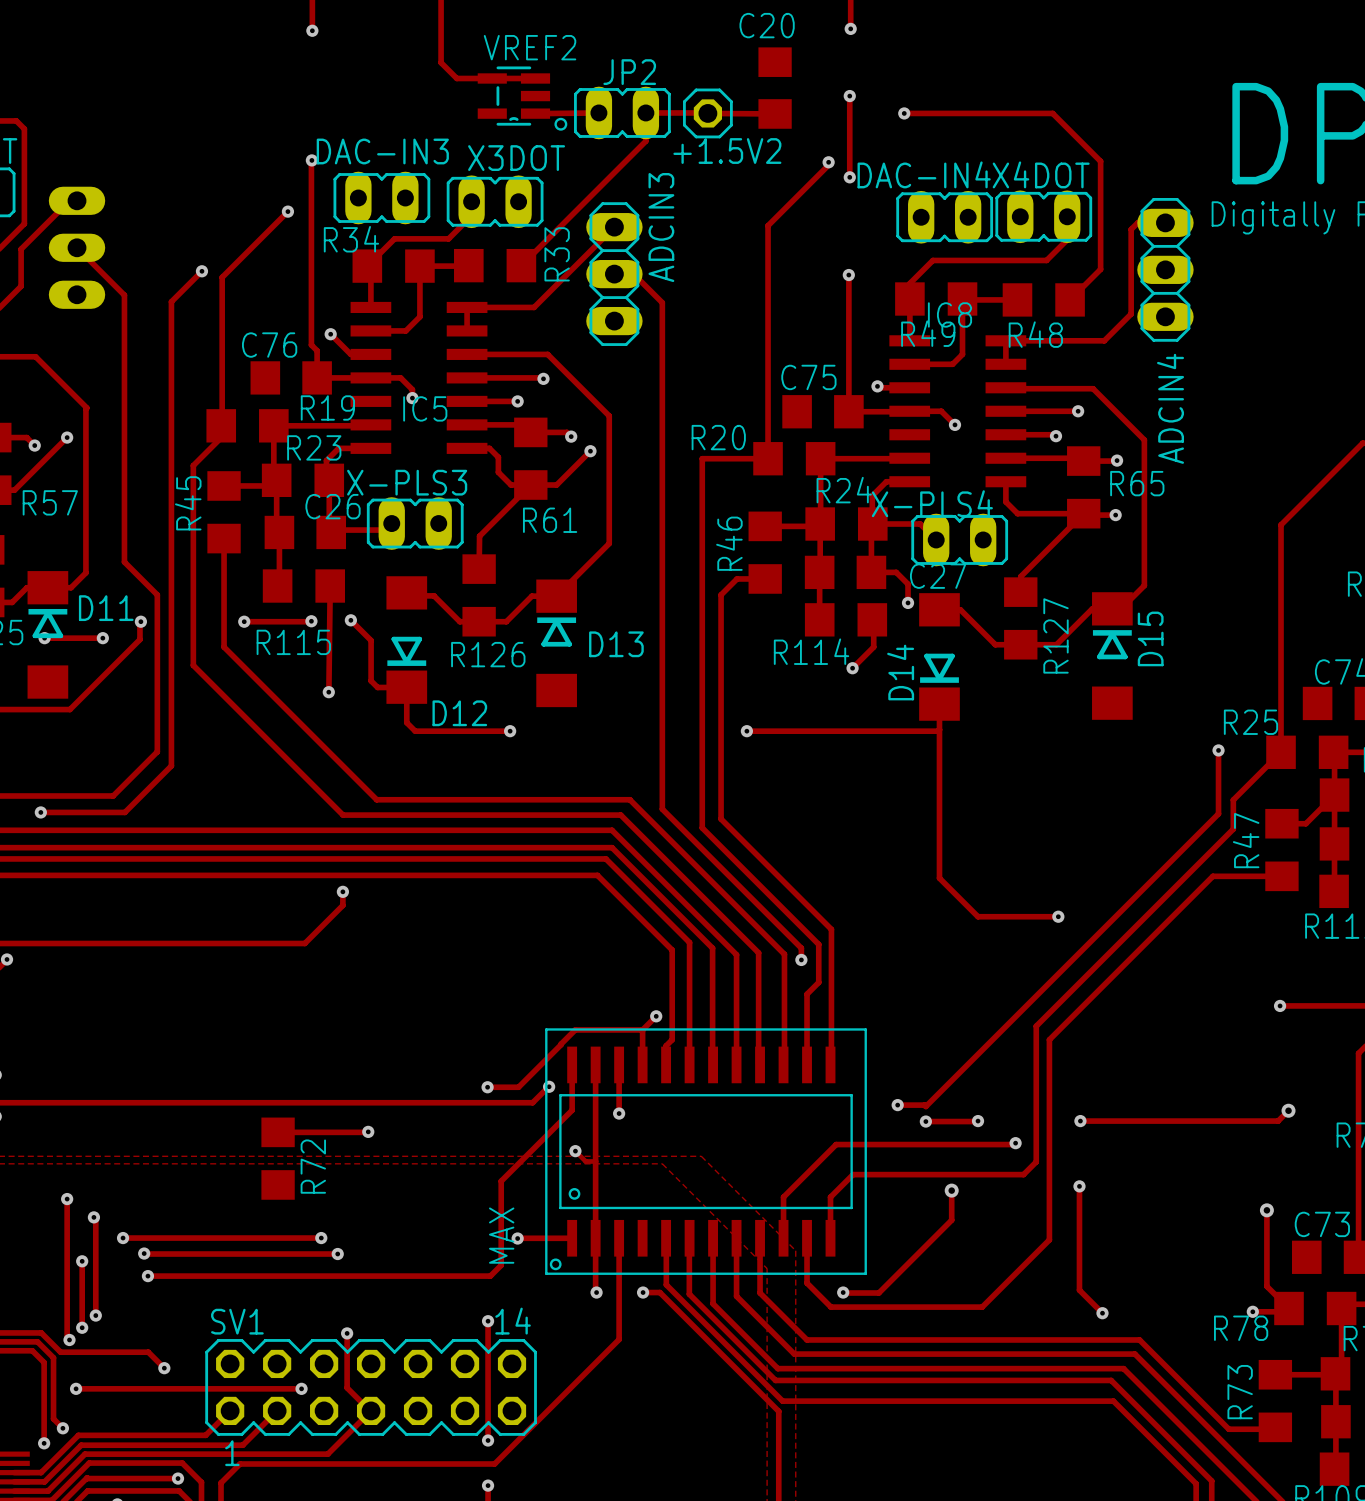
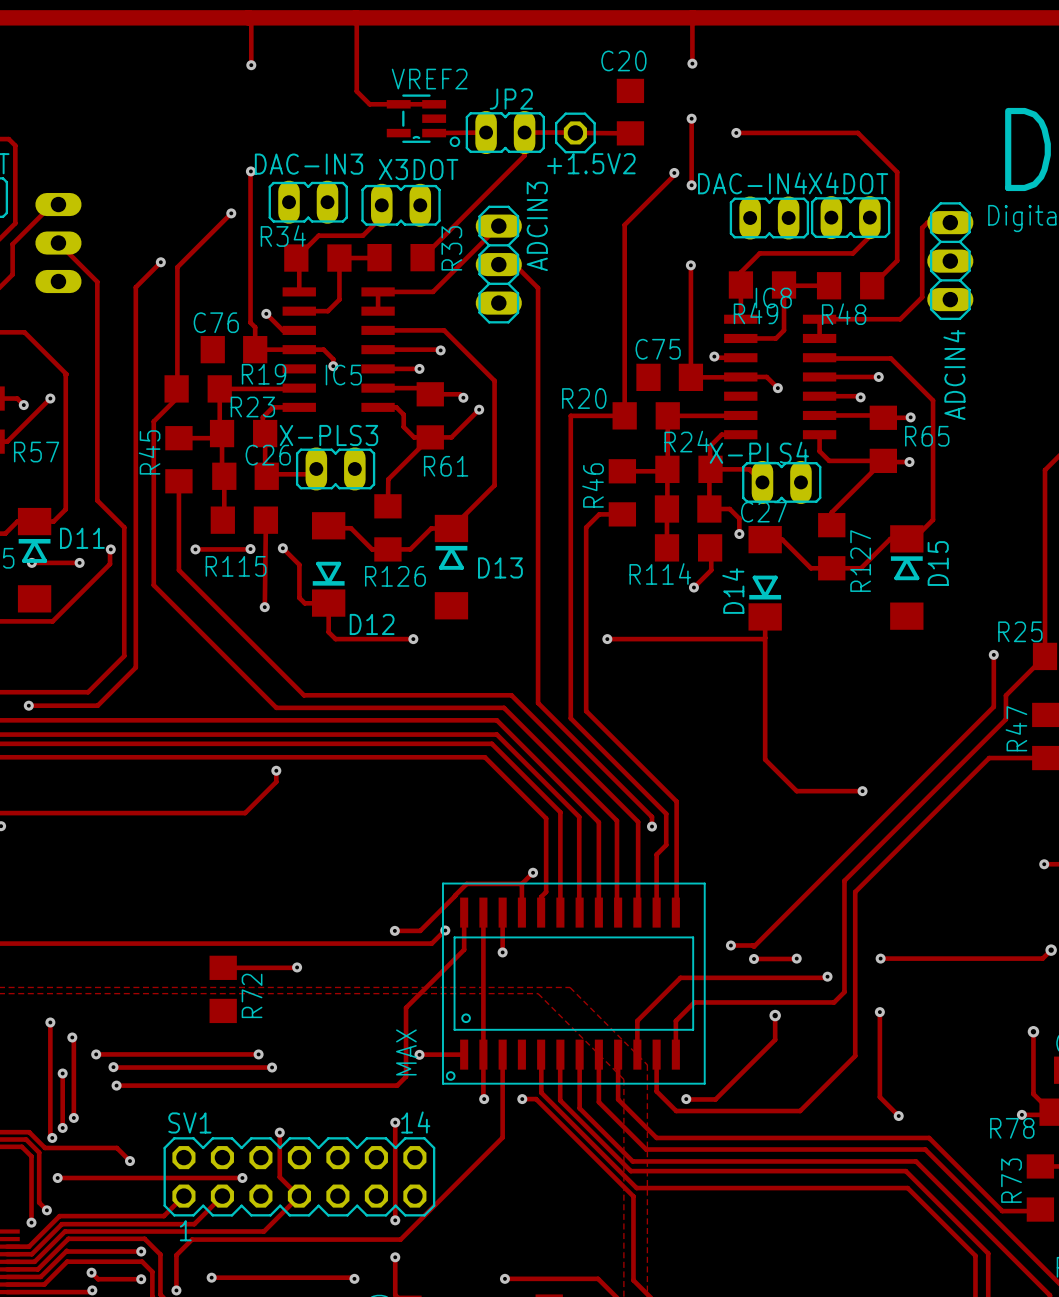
track: (575, 1151) (585, 1161) (595, 1161) -> none
via: (575, 1151) -> none

